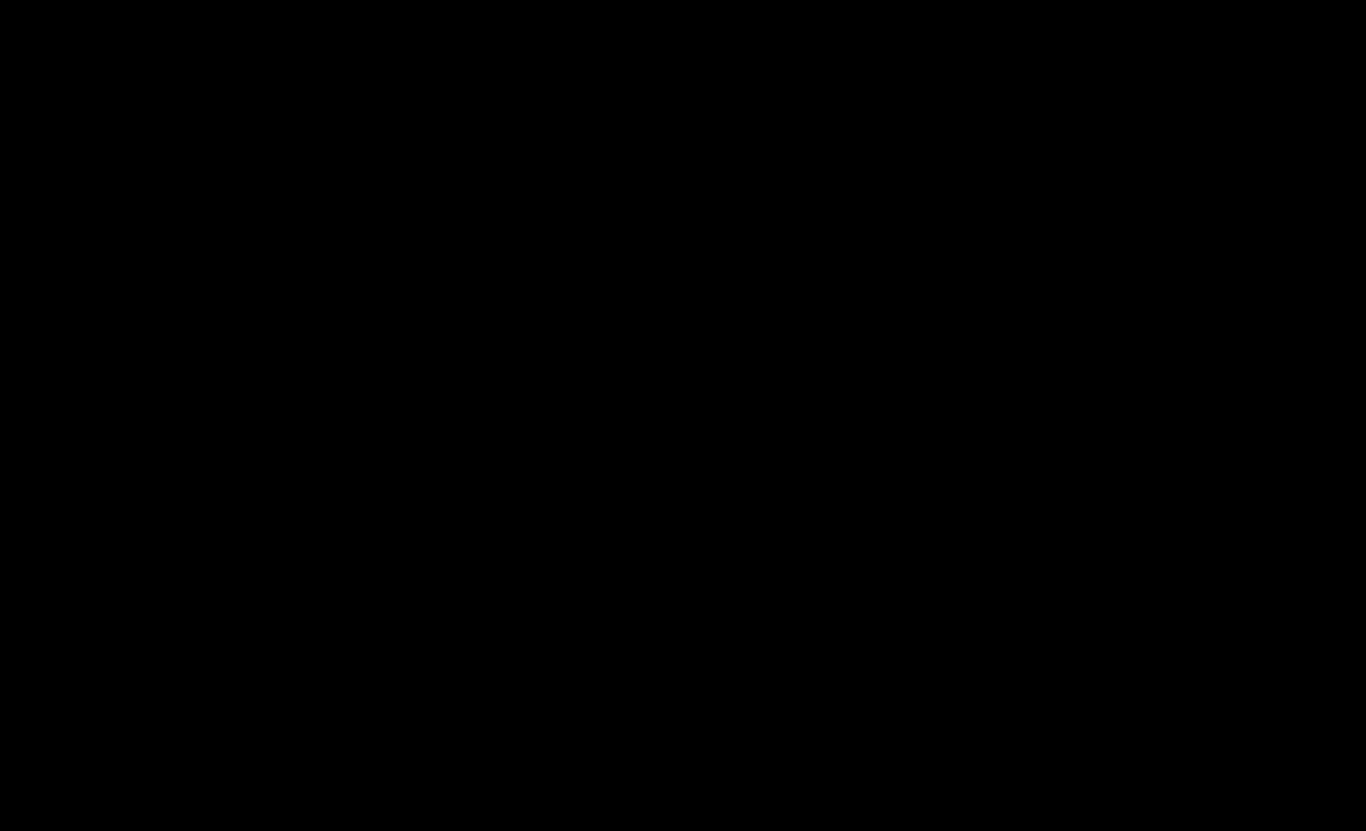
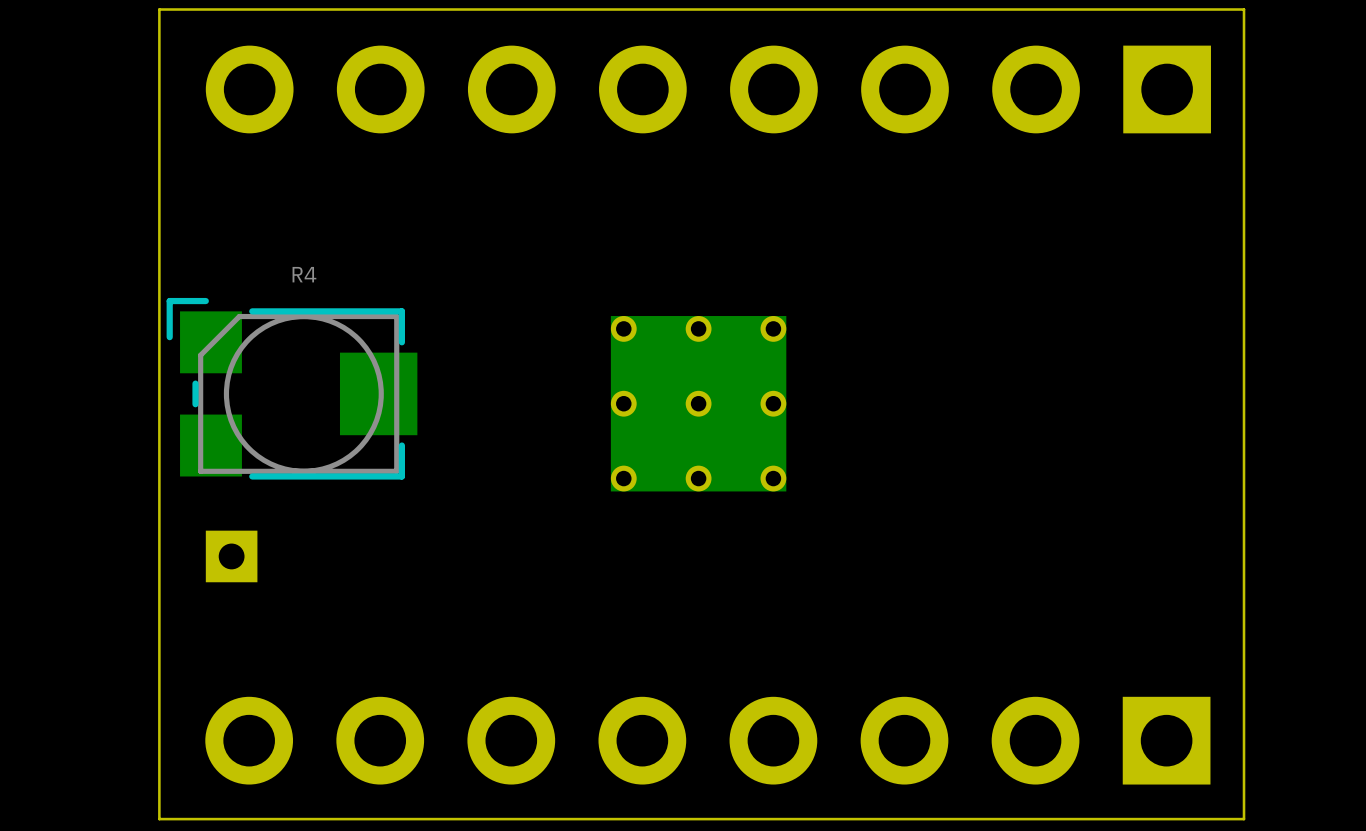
board edge: none -> (1244, 9) (159, 9) (159, 819) (1244, 819) (1244, 9)
part: none -> (708, 89)
part: none -> (291, 388)
part: none -> (698, 403)
part: none -> (231, 556)
part: none -> (707, 740)

